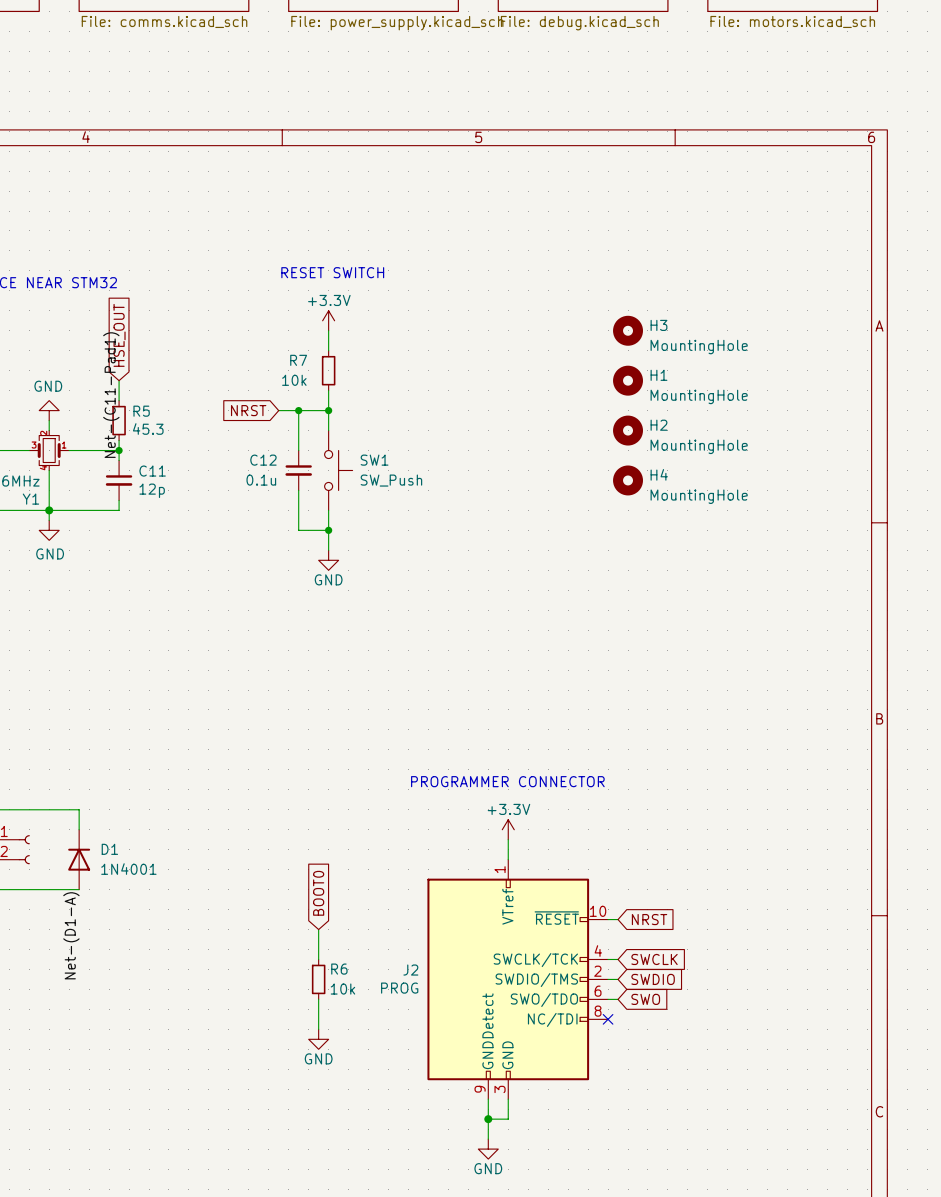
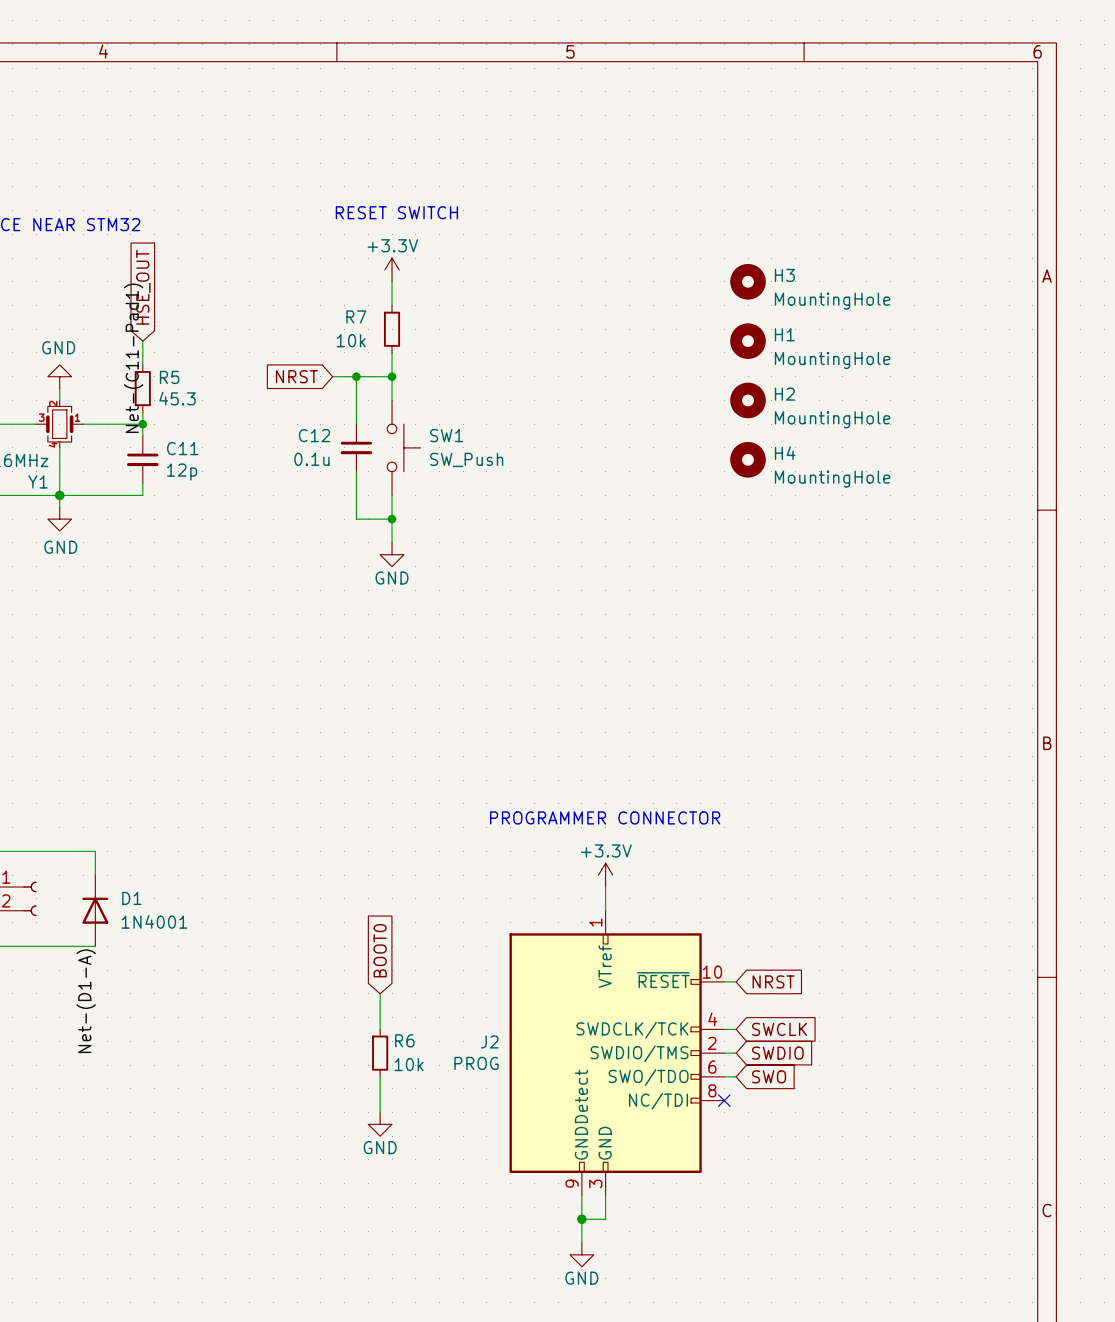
J2 pin name: SWCLK/TCK (535, 960) -> SWDCLK/TCK (632, 1030)

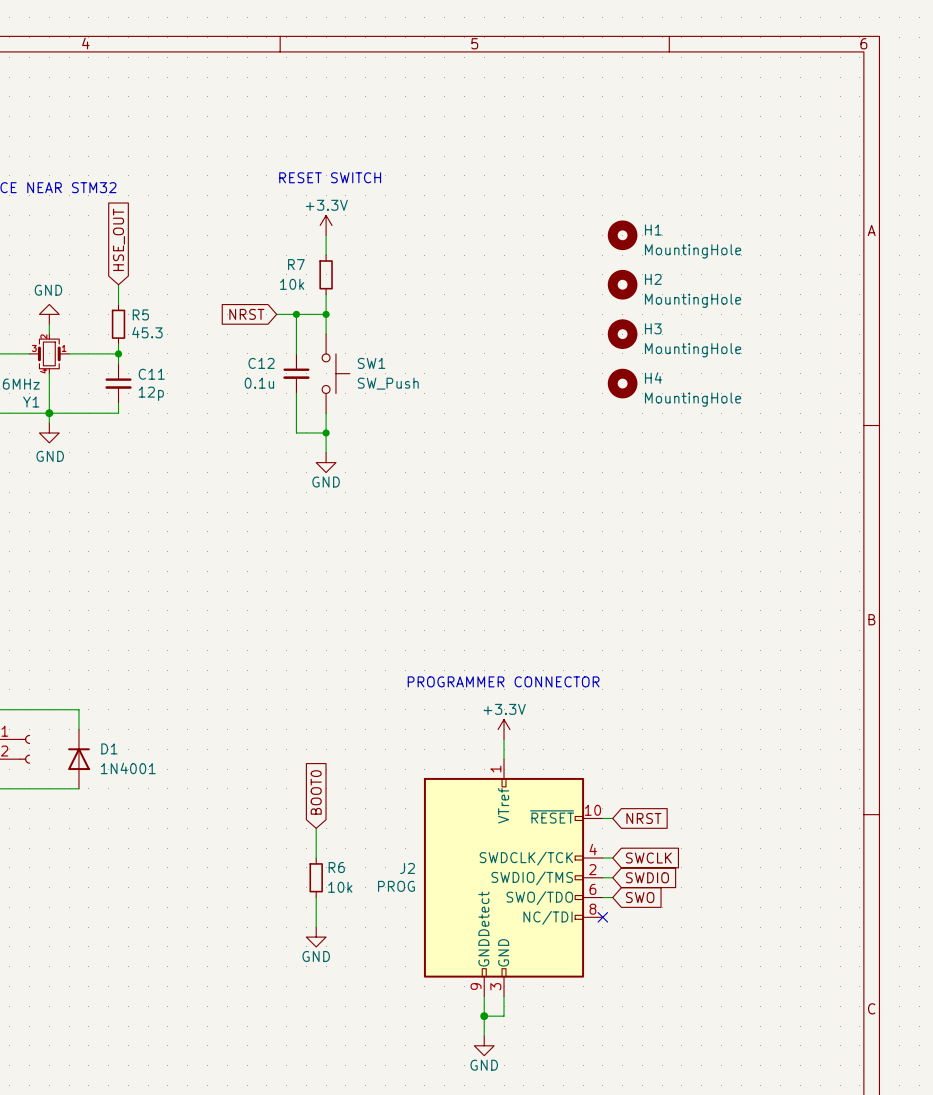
H3 name: H3 (784, 275) -> H1 (653, 229)
H1 name: H1 (784, 334) -> H2 (653, 279)
label: Net-(C11-Pad1) (133, 358) -> none
H2 name: H2 (784, 394) -> H3 (653, 328)
label: Net-(D1-A) (86, 1001) -> none

